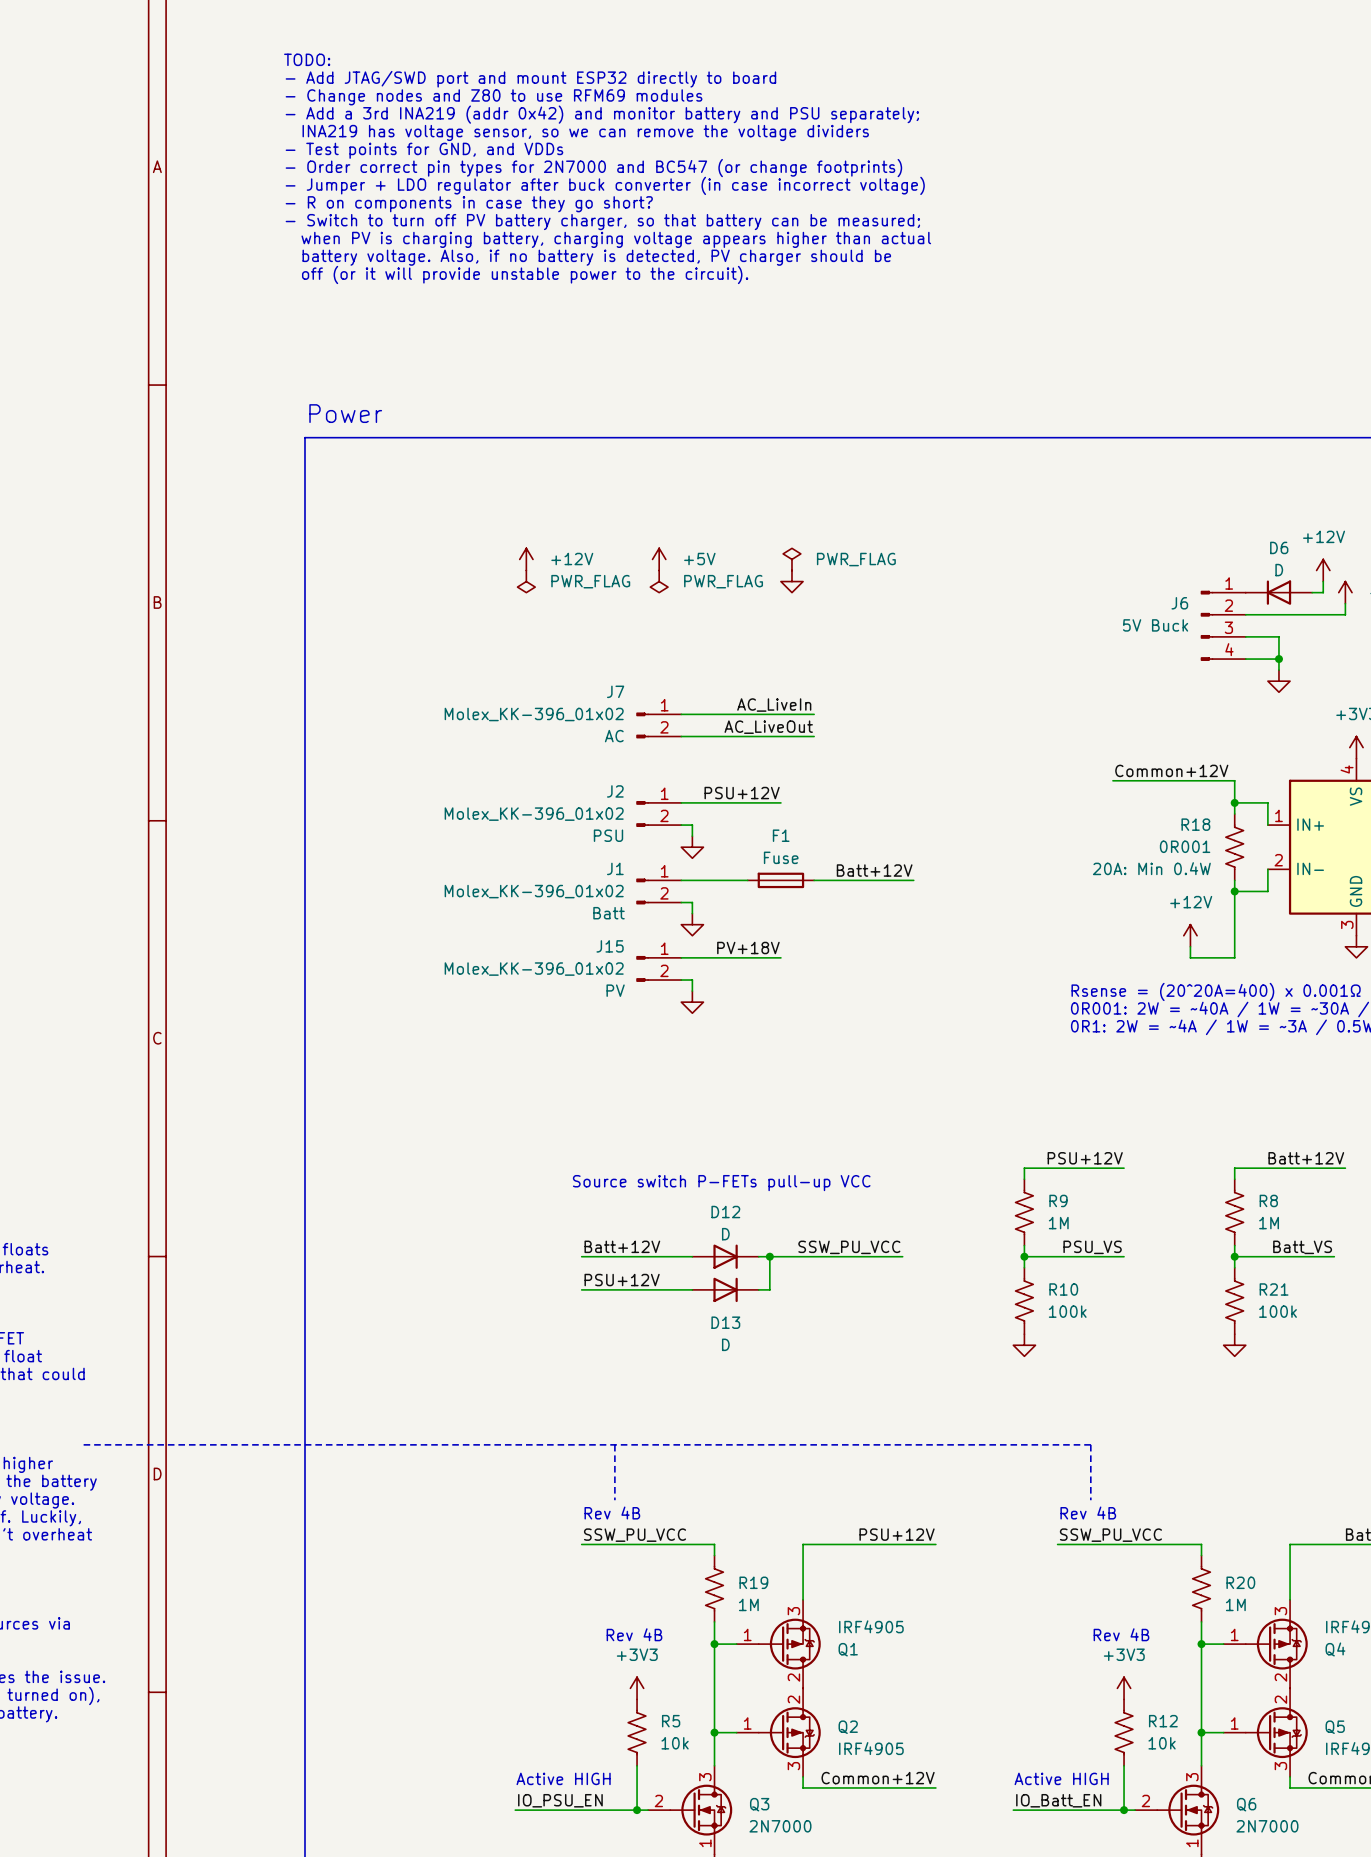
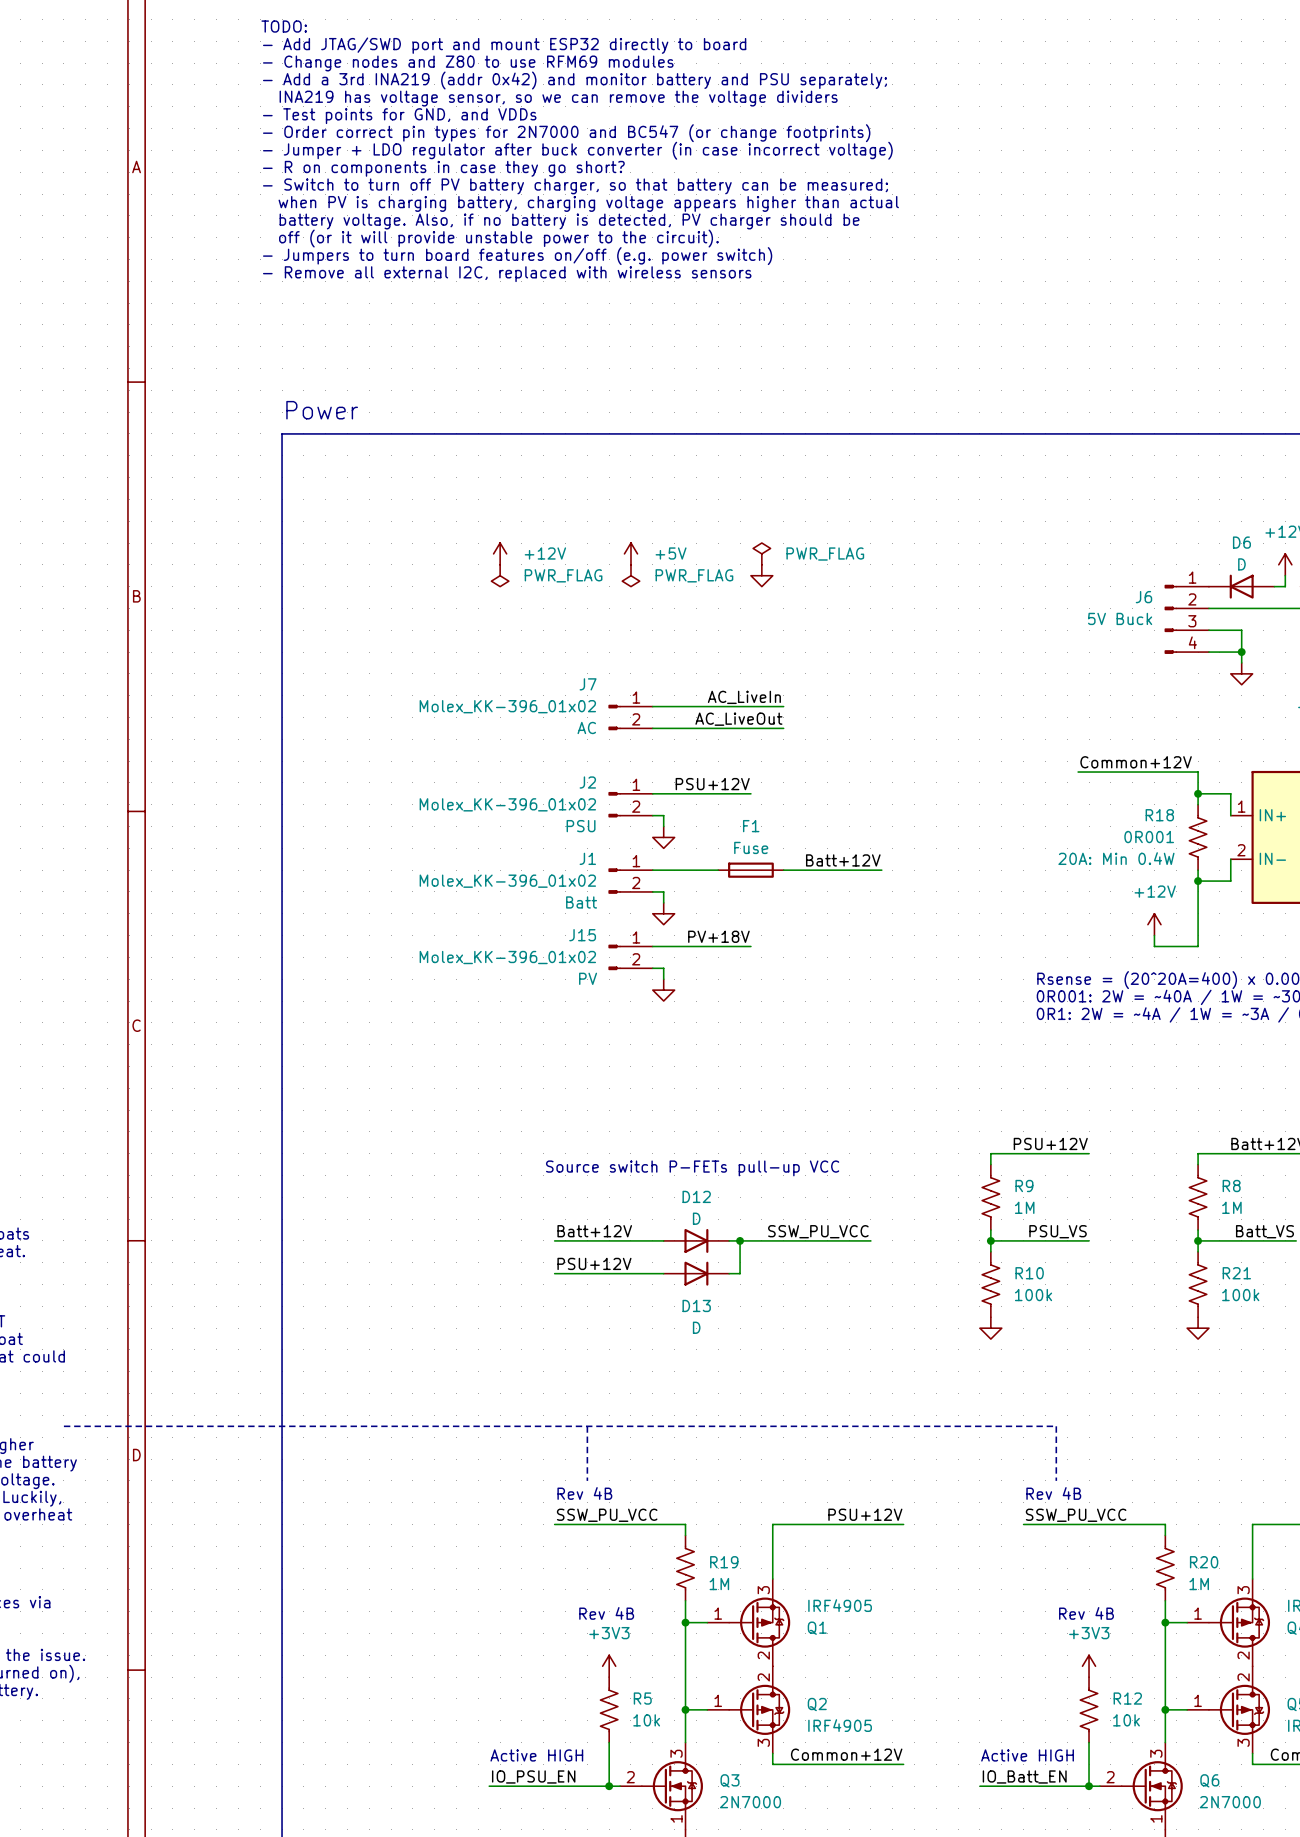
text: none -> TODO: (284, 26)
text: none -> - Add JTAG/SWD port and mount ESP32 directly to board (504, 45)
text: TODO: (307, 59) -> - Change nodes and Z80 to use RFM69 modules (468, 63)
text: - Add JTAG/SWD port and mount ESP32 directly to board (530, 79) -> - Add a 3rd INA219 (addr 0x42) and monitor battery and PSU separately; (574, 80)
text: - Change nodes and Z80 to use RFM69 modules (494, 97) -> INA219 has voltage sensor, so we can remove the voltage dividers (558, 98)
text: - Add a 3rd INA219 (addr 0x42) and monitor battery and PSU separately; (602, 114) -> - Test points for GND, and VDDs (399, 116)
text: INA219 has voltage sensor, so we can remove the voltage dividers (585, 132) -> - Order correct pin types for 2N7000 and BC547 (or change footprints) (566, 133)
text: - Test points for GND, and VDDs (424, 150) -> - Jumper + LDO regulator after buck converter (in case incorrect voltage) (577, 150)
text: - Order correct pin types for 2N7000 and BC547 (or change footprints) (593, 168) -> - R on components in case they go short? (443, 168)
text: - Jumper + LDO regulator after buck converter (in case incorrect voltage) (605, 185) -> - Switch to turn off PV battery charger, so that battery can be measured; (575, 186)
text: - R on components in case they go short? (469, 204) -> when PV is charging battery, charging voltage appears higher than actual (588, 203)
text: - Switch to turn off PV battery charger, so that battery can be measured; (602, 222) -> battery voltage. Also, if no battery is detected, PV charger should be (569, 221)
text: when PV is charging battery, charging voltage appears higher than actual (616, 239) -> off (or it will provide unstable power to the circuit). (498, 238)
text: battery voltage. Also, if no battery is detected, PV charger should be (596, 257) -> - Jumpers to turn board features on/off (e.g. power switch) (517, 256)
text: off (or it will provide unstable power to the circuit). (525, 274) -> - Remove all external I2C, replaced with wireless sensors (507, 274)

